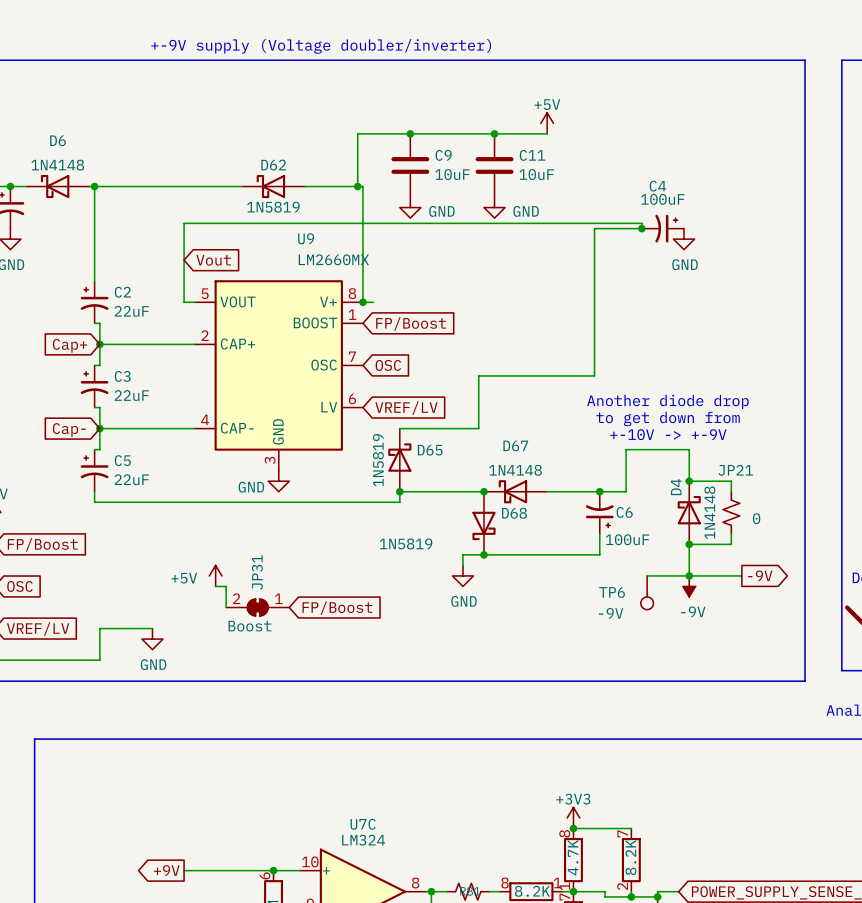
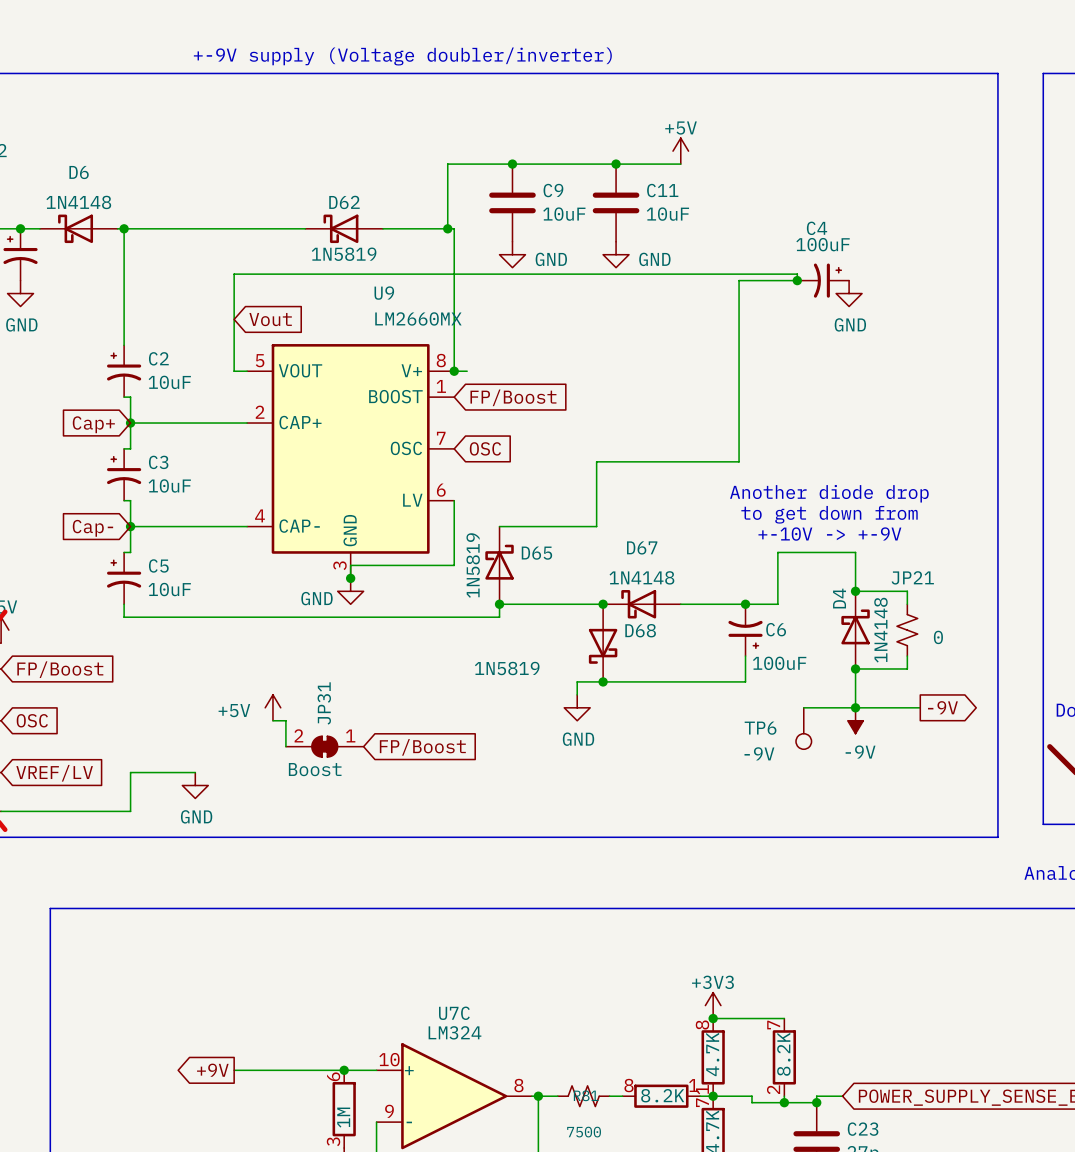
C2 value: 22uF (131, 311) -> 10uF (169, 382)
C3 value: 22uF (131, 395) -> 10uF (169, 485)
wire: none -> (454, 500) (454, 565) (350, 565) (350, 578)
global label: VREF/LV (406, 408) -> none
junction: none -> (350, 578)
C5 value: 22uF (131, 479) -> 10uF (169, 589)

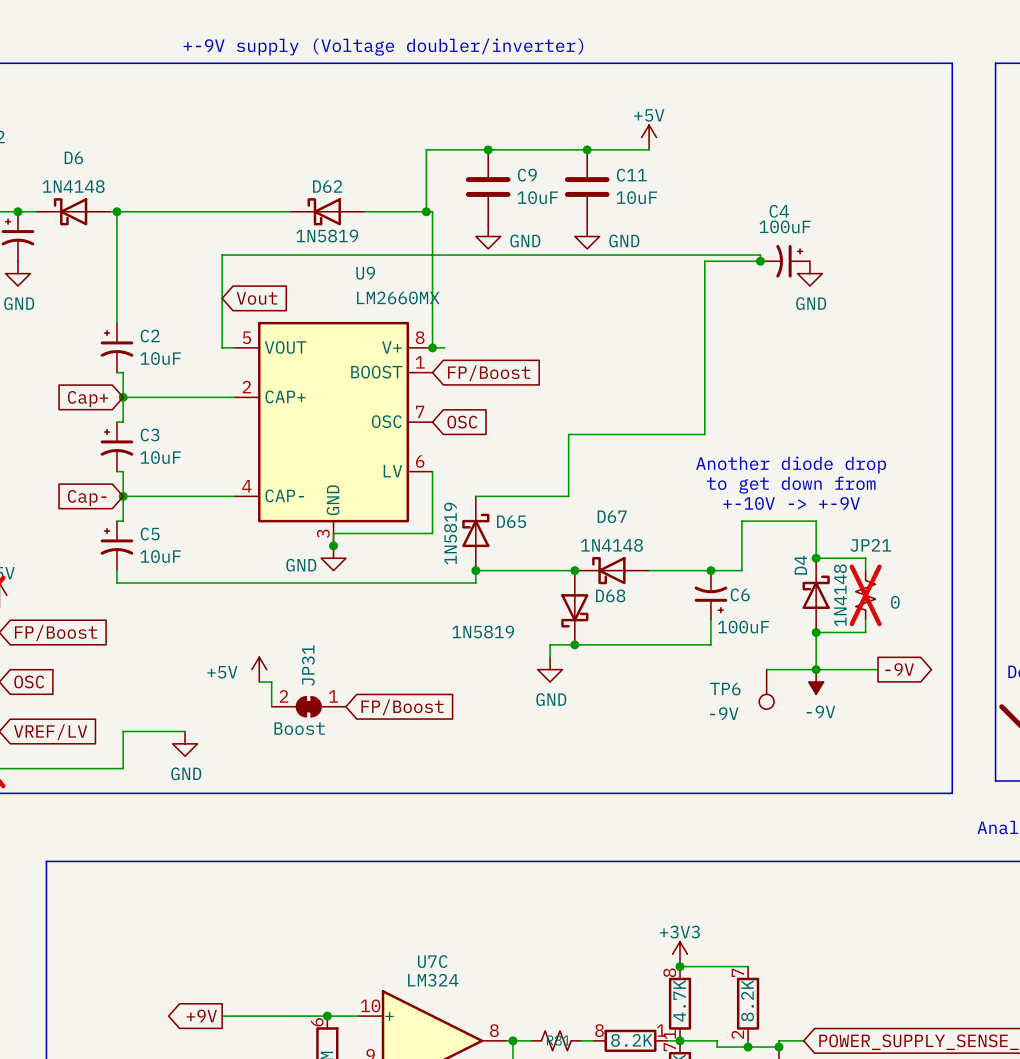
JP21 do-not-place cross: none -> (865, 595)

